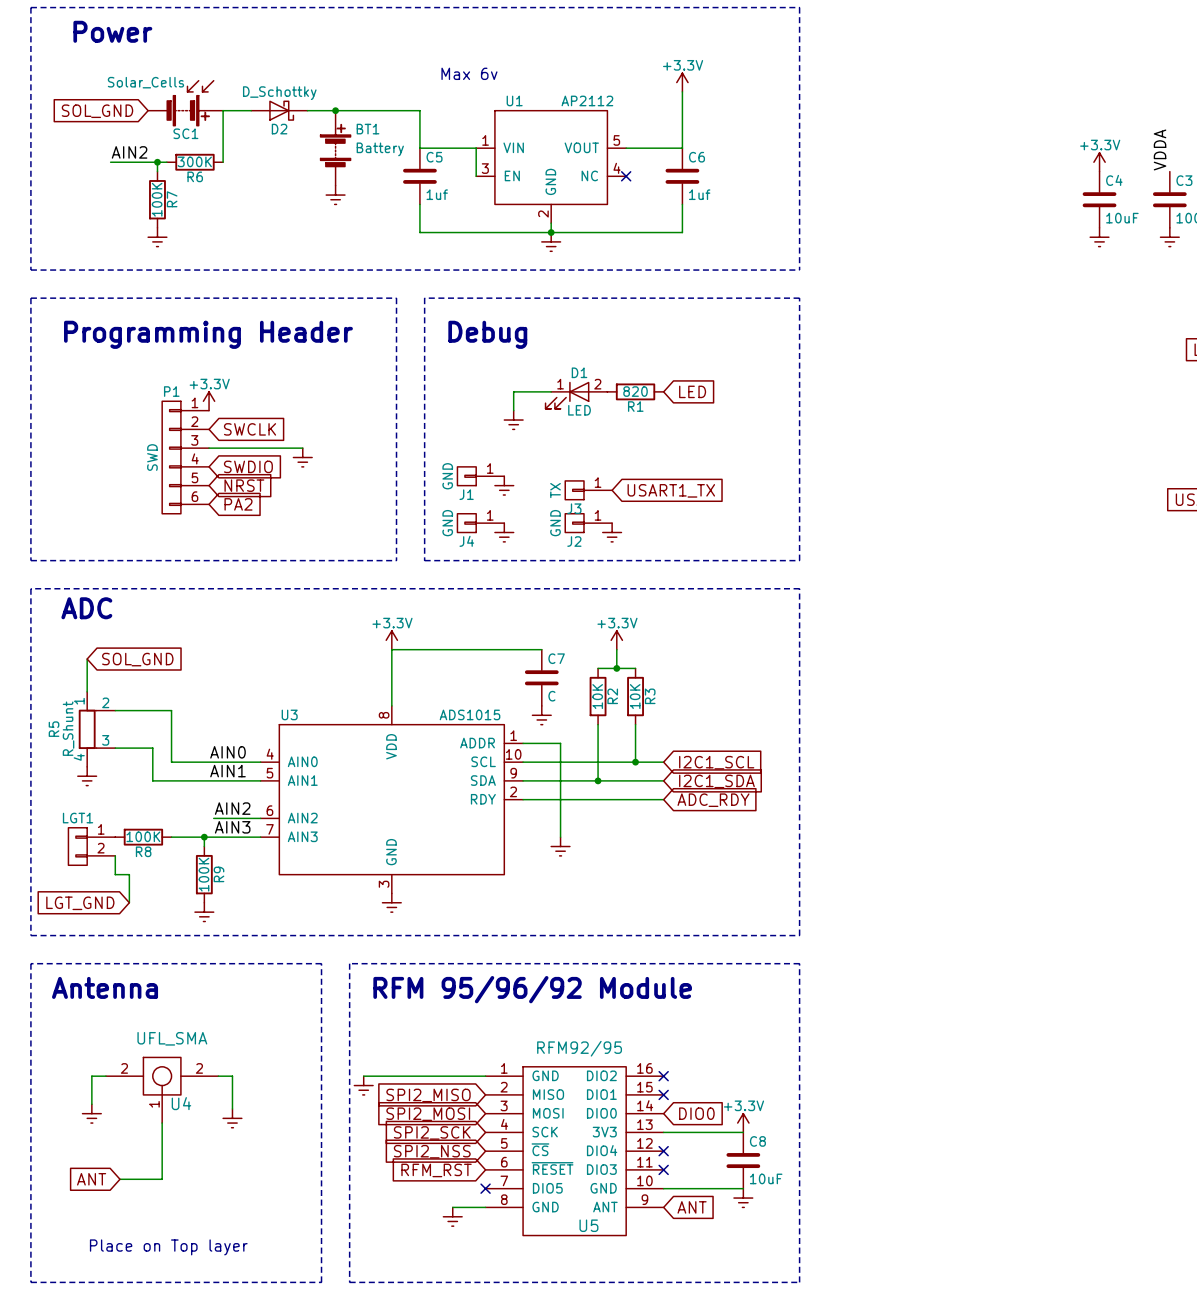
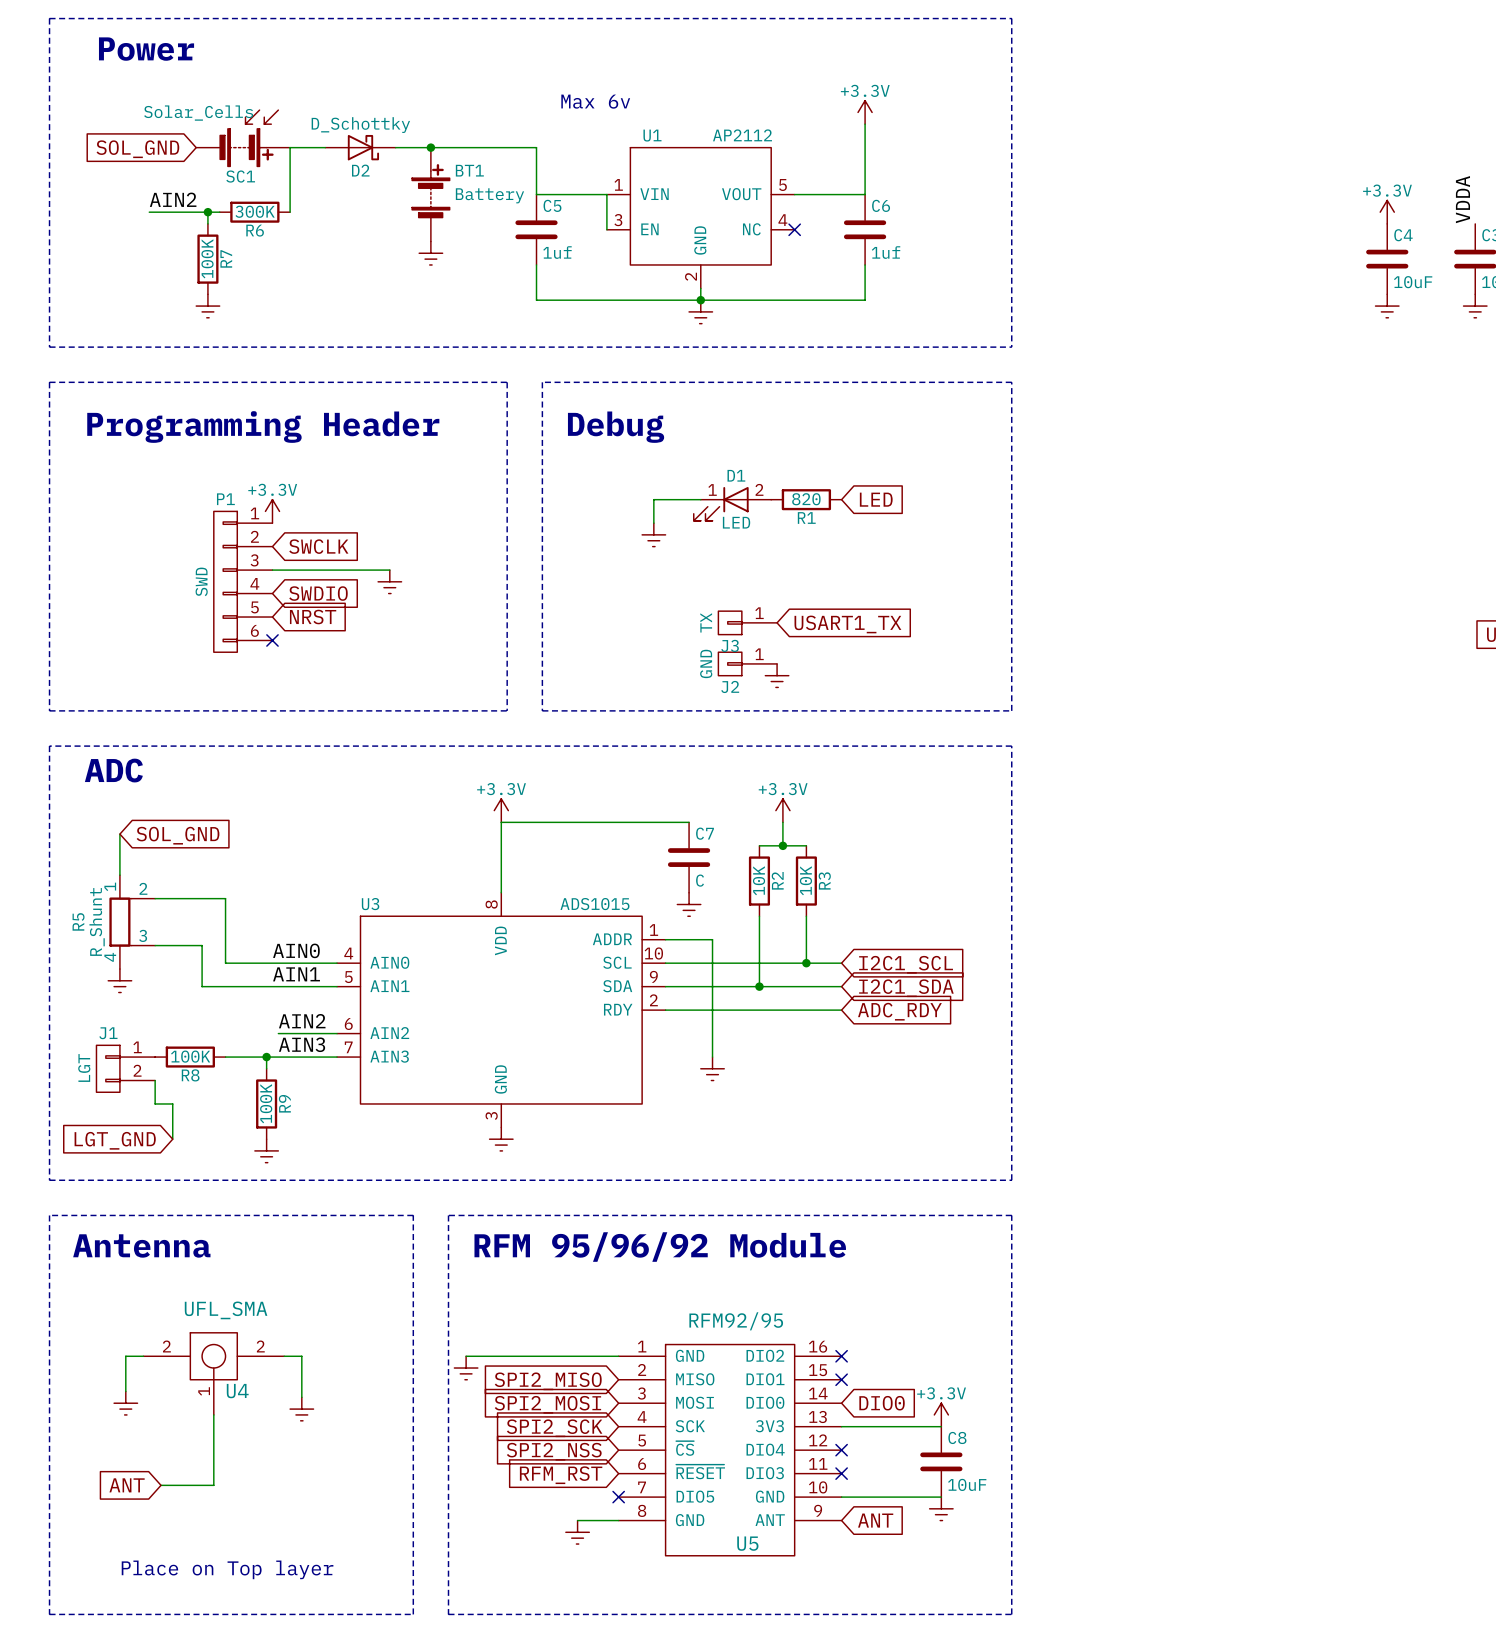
J1: GND (480, 476) -> none
power symbol: (504, 485) -> none
no-connect mark: none -> (272, 640)
global label: PA2 (238, 504) -> none
J4: GND (480, 523) -> none
power symbol: (504, 532) -> none
LGT1 name: LGT1 (78, 818) -> J1 (108, 1033)
LGT1 value: none -> LGT (84, 1067)

